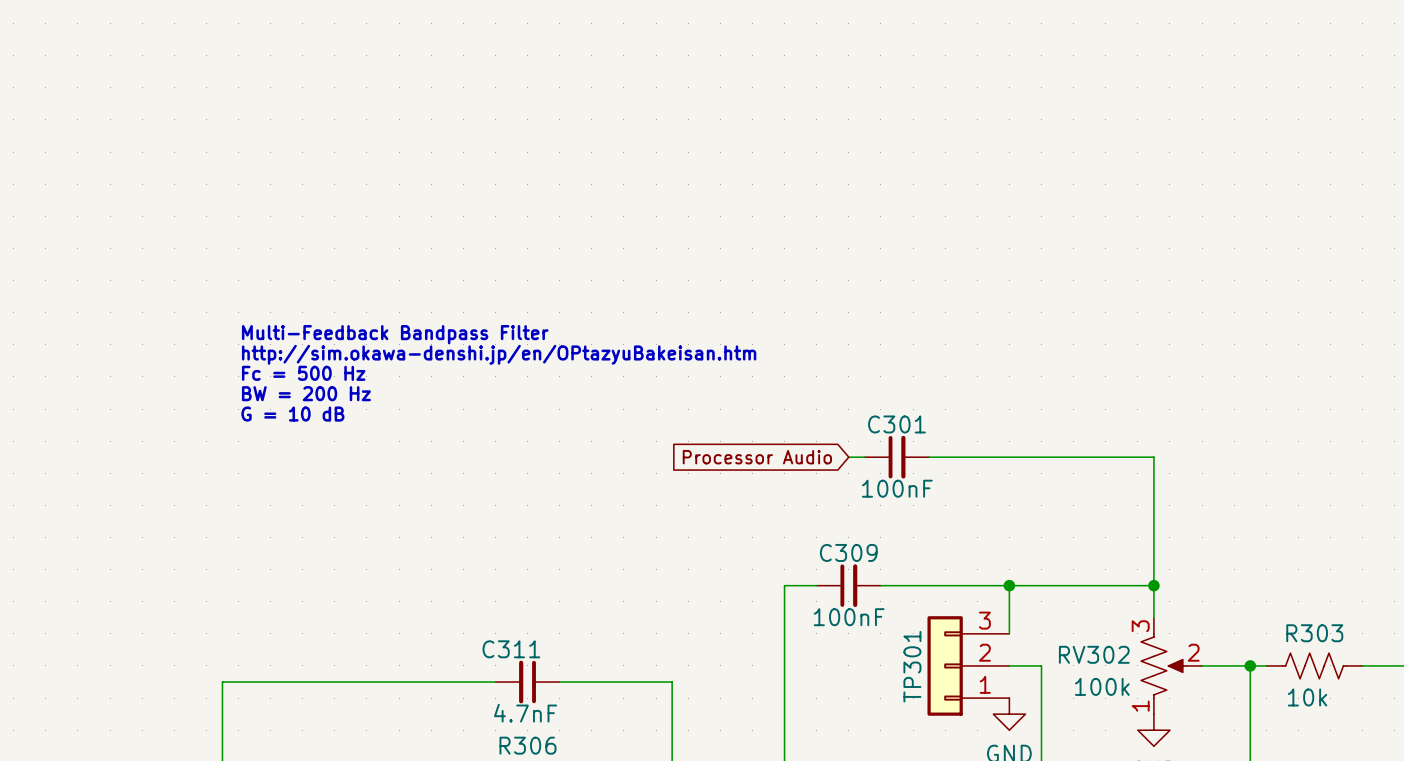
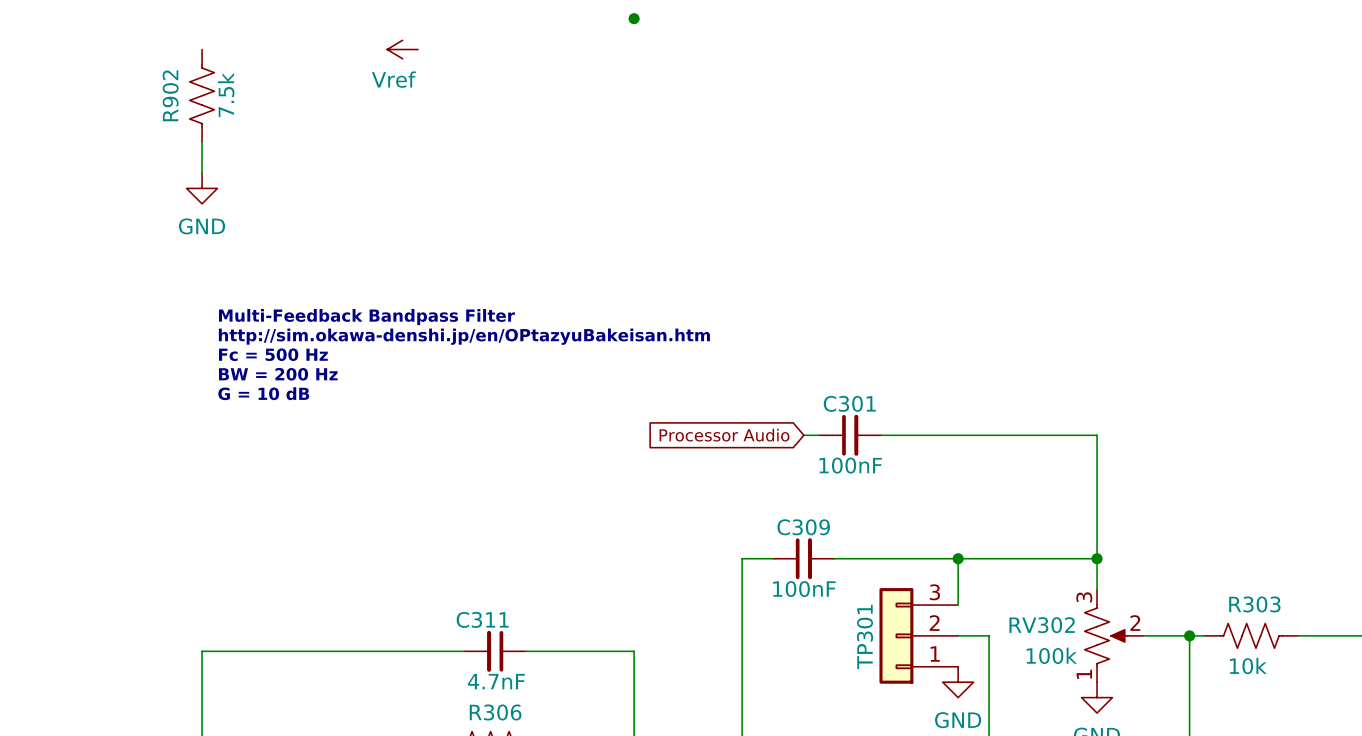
junction: none -> (634, 18)
power symbol: none -> Vref (402, 49)
R902: none -> 7.5k (202, 95)
wire: none -> (202, 142) (202, 172)
power symbol: none -> GND (202, 188)

